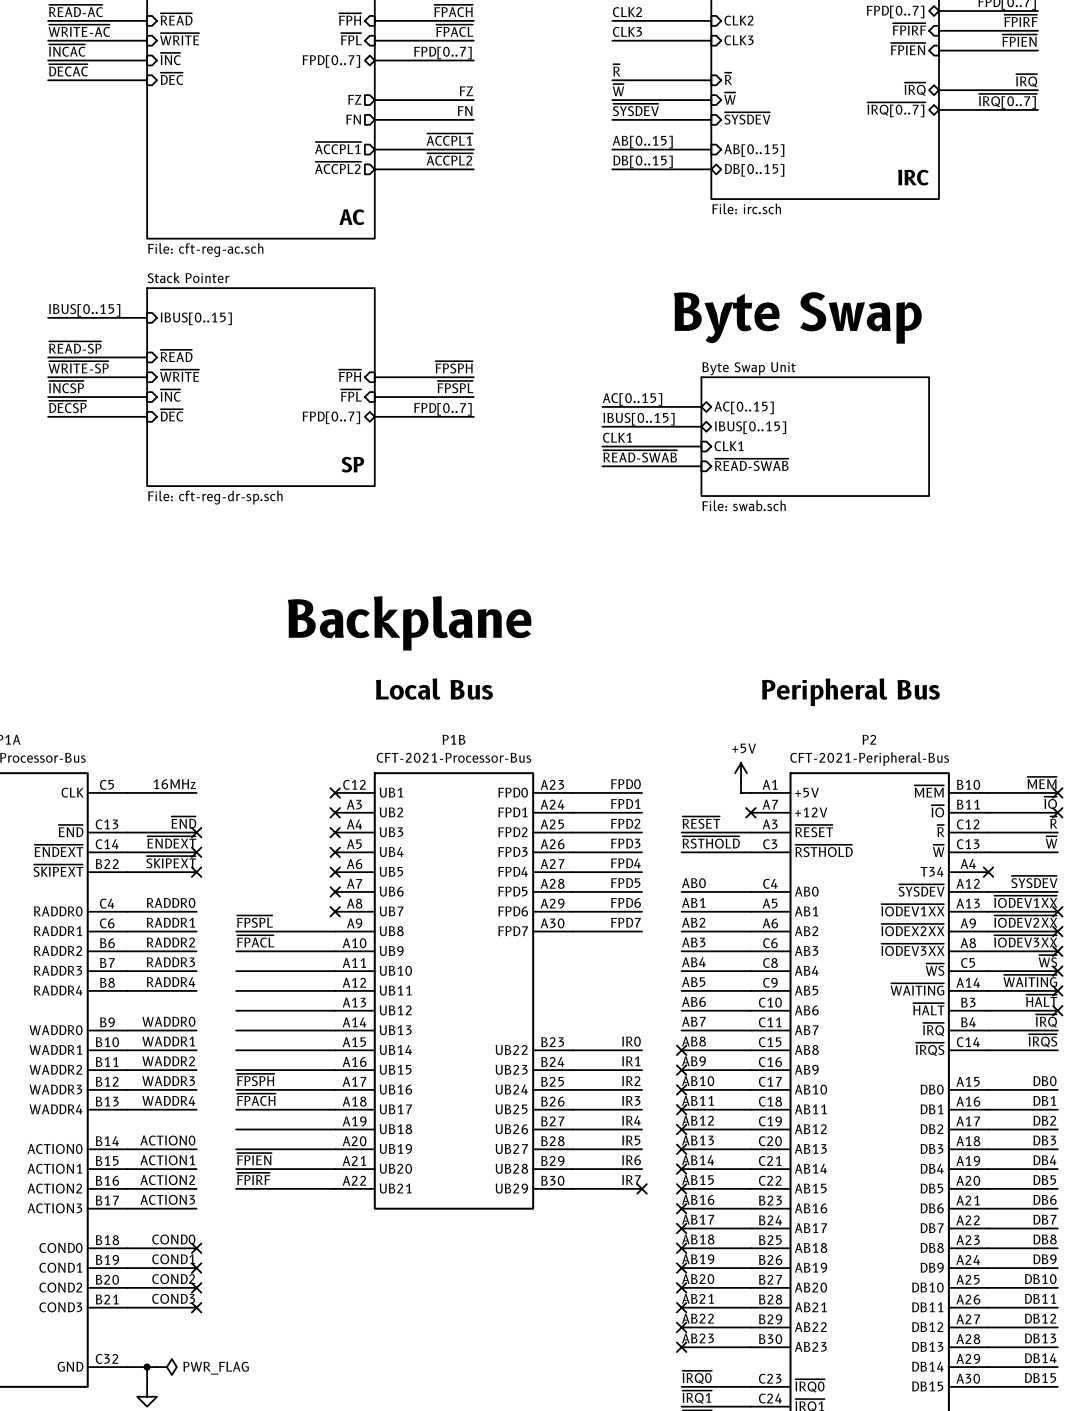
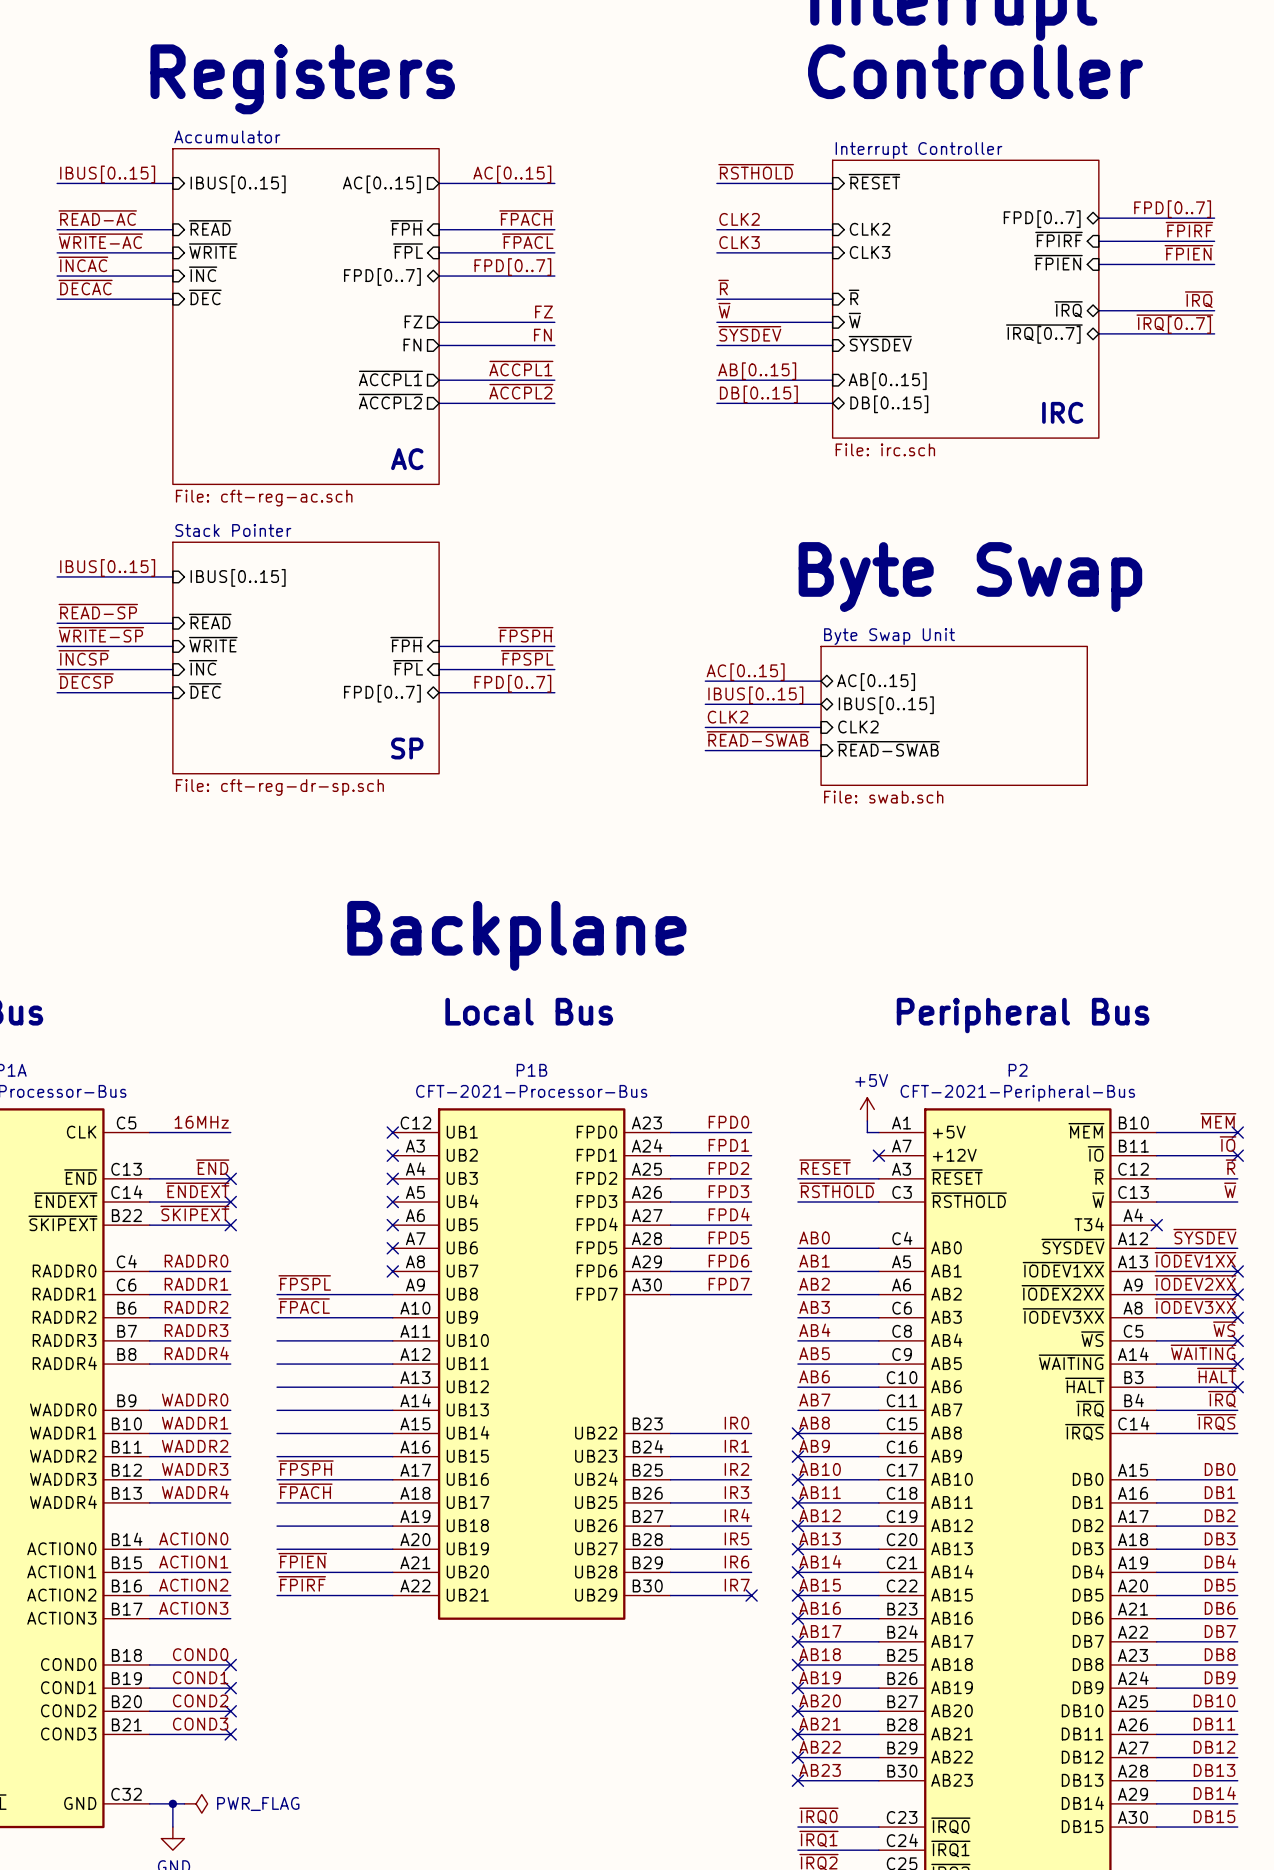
label: CLK1 (617, 437) -> CLK2 (728, 717)
sheet pin: CLK1 (729, 446) -> CLK2 (858, 727)

